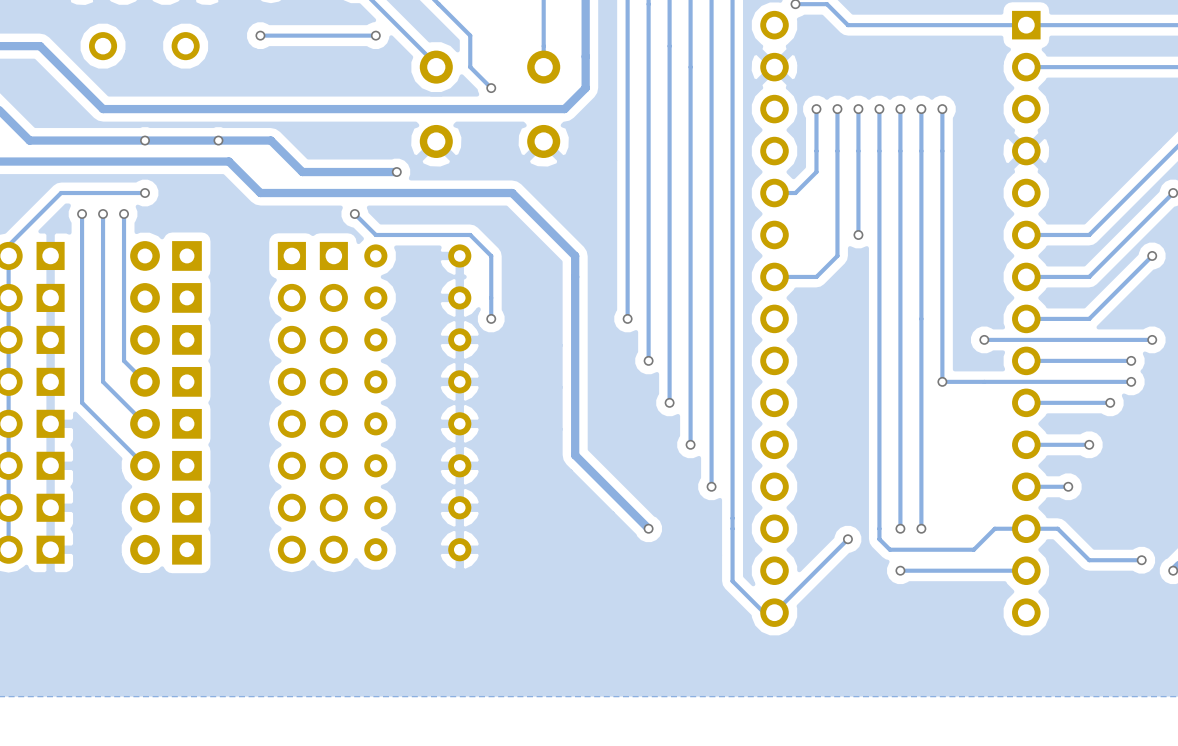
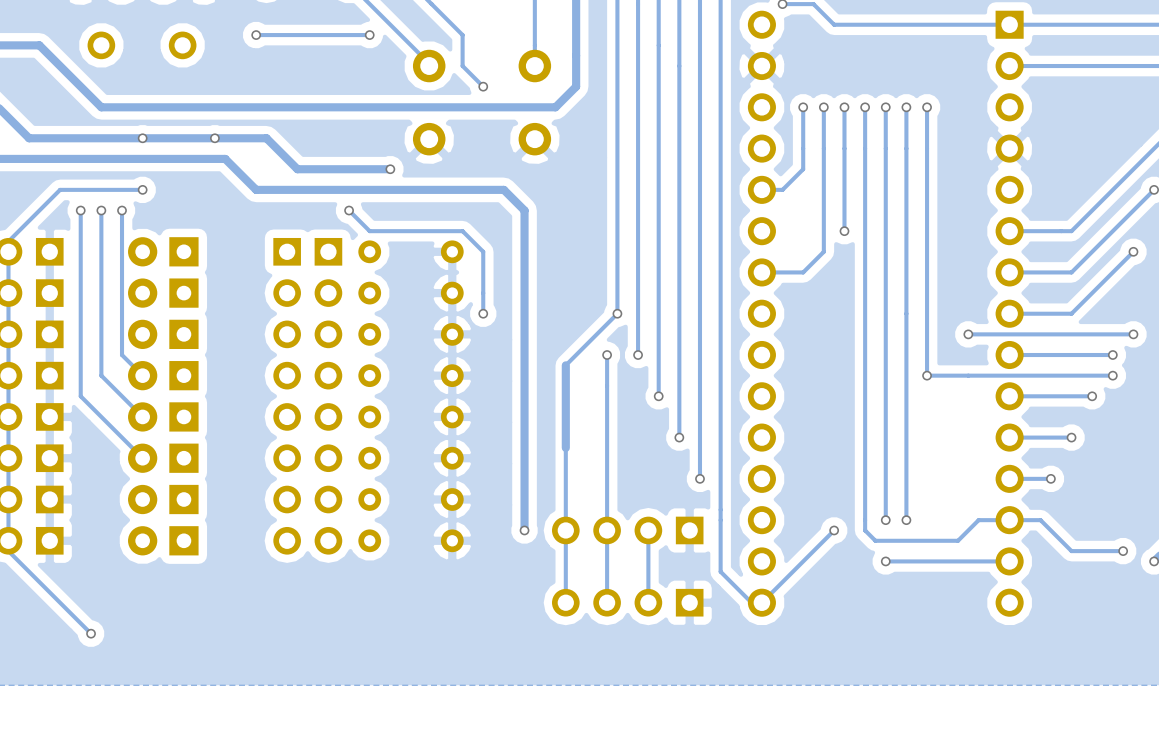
track: (533, 214) (575, 255) (575, 371) -> (617, 313) (565, 365)
track: none -> (524, 210) (524, 530)
track: none -> (607, 355) (607, 602)
via: none -> (607, 355)
track: (575, 455) (648, 528) -> (565, 447) (565, 602)
via: (648, 528) -> none
via: none -> (524, 530)
part: none -> (627, 530)
track: none -> (648, 530) (648, 602)
track: none -> (8, 540) (8, 551) (91, 633)
part: none -> (627, 602)
via: none -> (91, 633)

